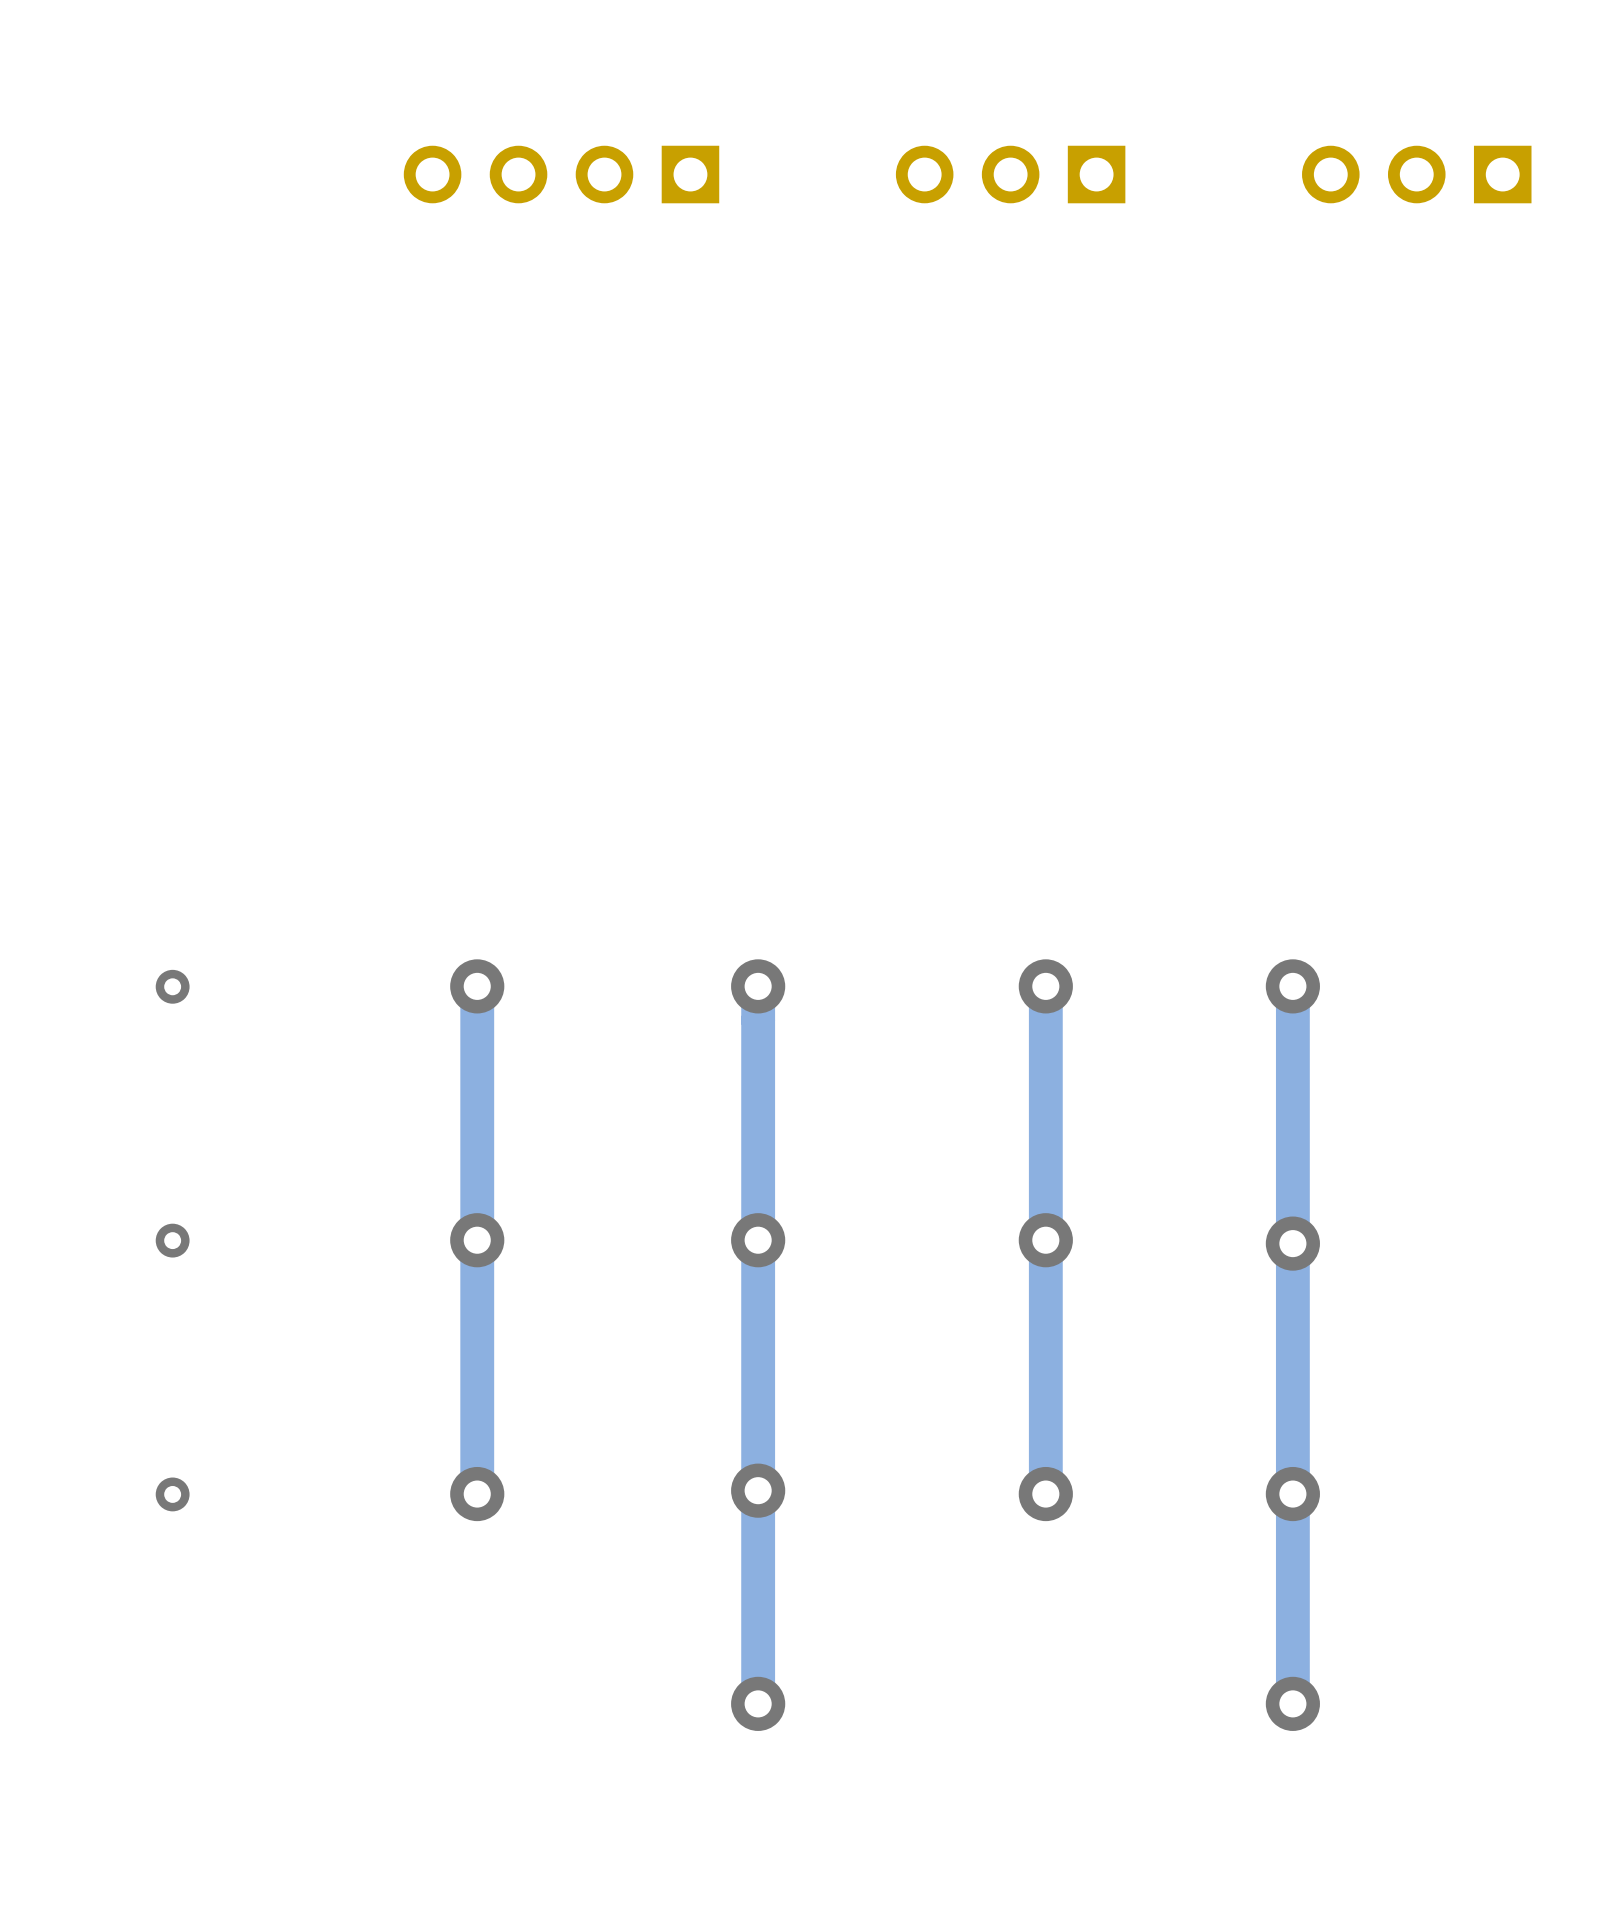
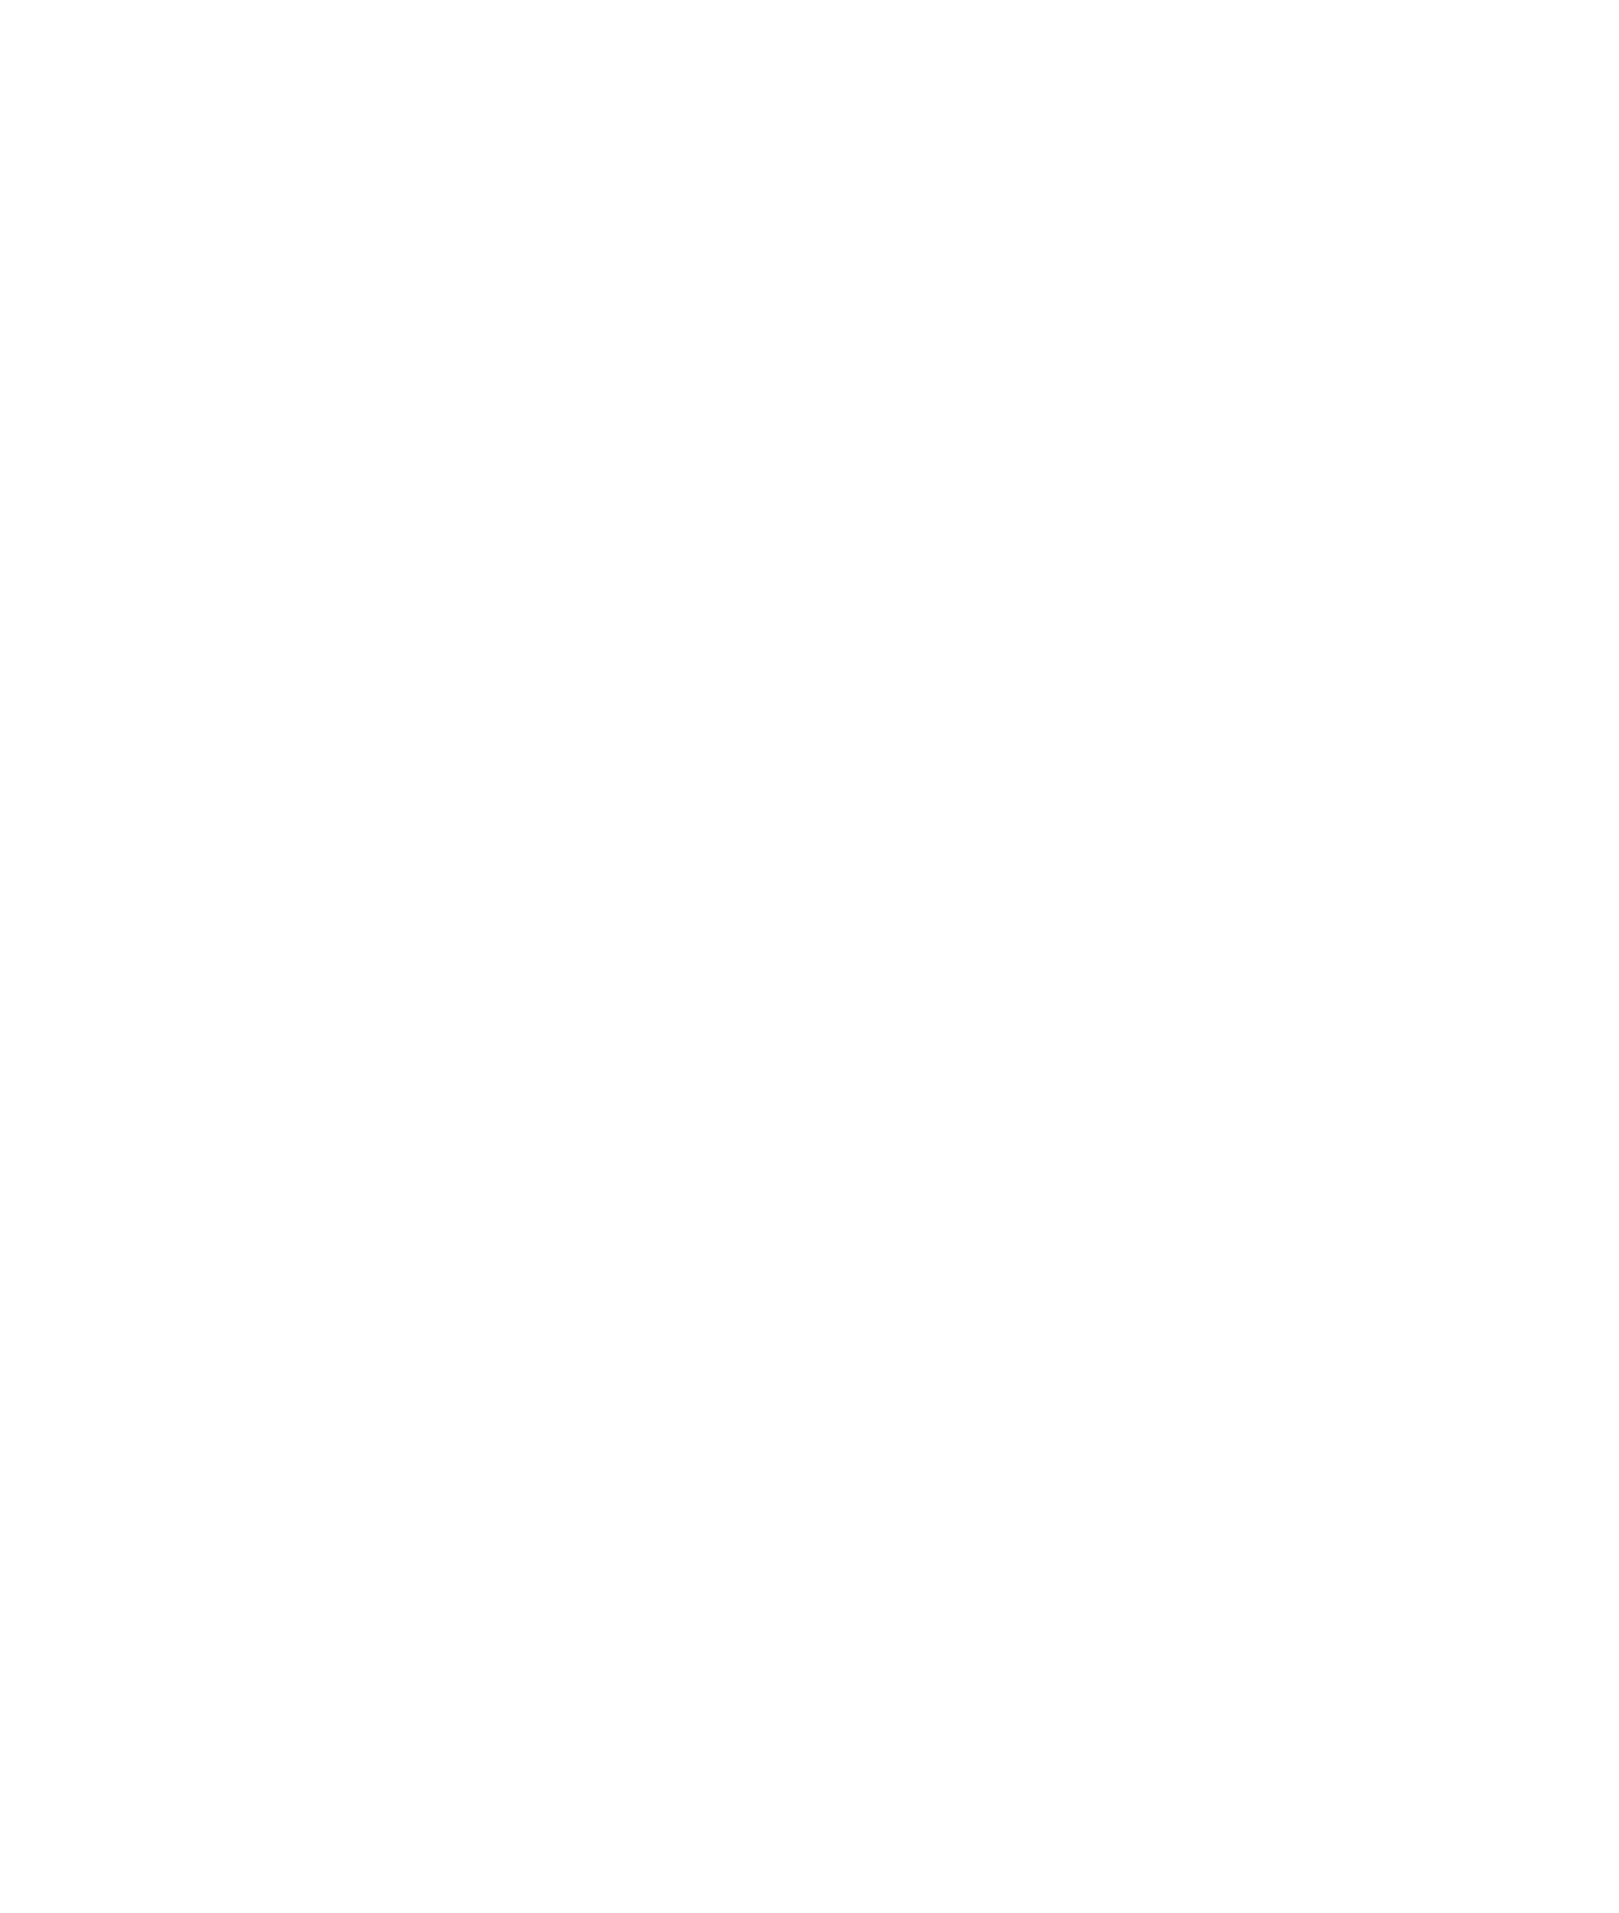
part: (561, 174) -> none
part: (1010, 174) -> none
part: (1416, 174) -> none
via: (172, 986) -> none
track: (477, 986) (477, 1494) -> none
via: (477, 986) -> none
track: (758, 986) (758, 1703) -> none
via: (758, 986) -> none
track: (1045, 986) (1045, 1494) -> none
via: (1045, 986) -> none
track: (1292, 986) (1292, 1703) -> none
via: (1292, 986) -> none
via: (172, 1240) -> none
via: (477, 1240) -> none
via: (758, 1240) -> none
via: (1045, 1240) -> none
via: (1292, 1243) -> none
via: (758, 1490) -> none
via: (172, 1494) -> none
via: (477, 1494) -> none
via: (1045, 1494) -> none
via: (1292, 1494) -> none
via: (758, 1703) -> none
via: (1292, 1703) -> none

